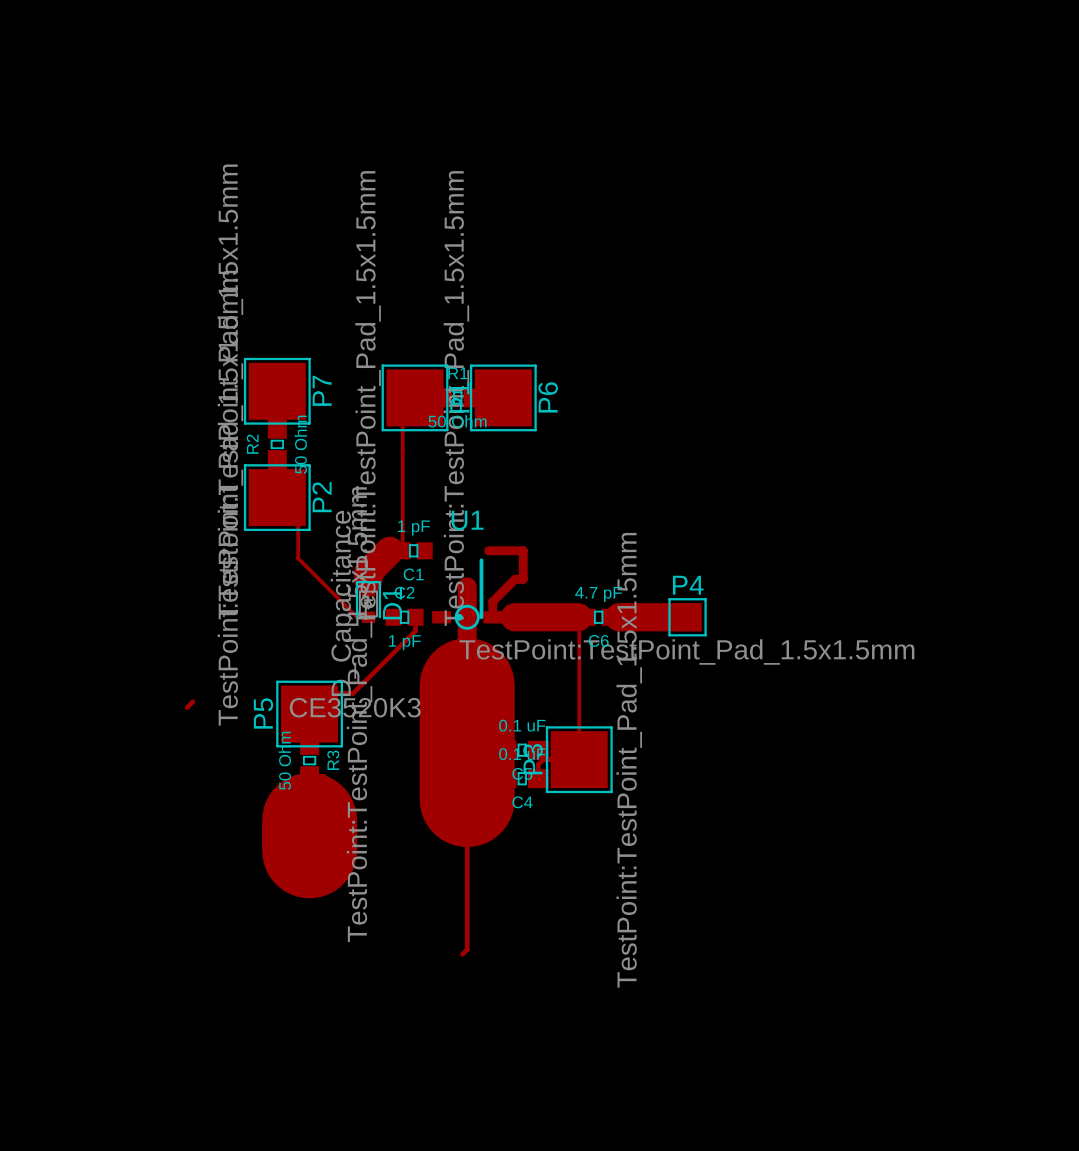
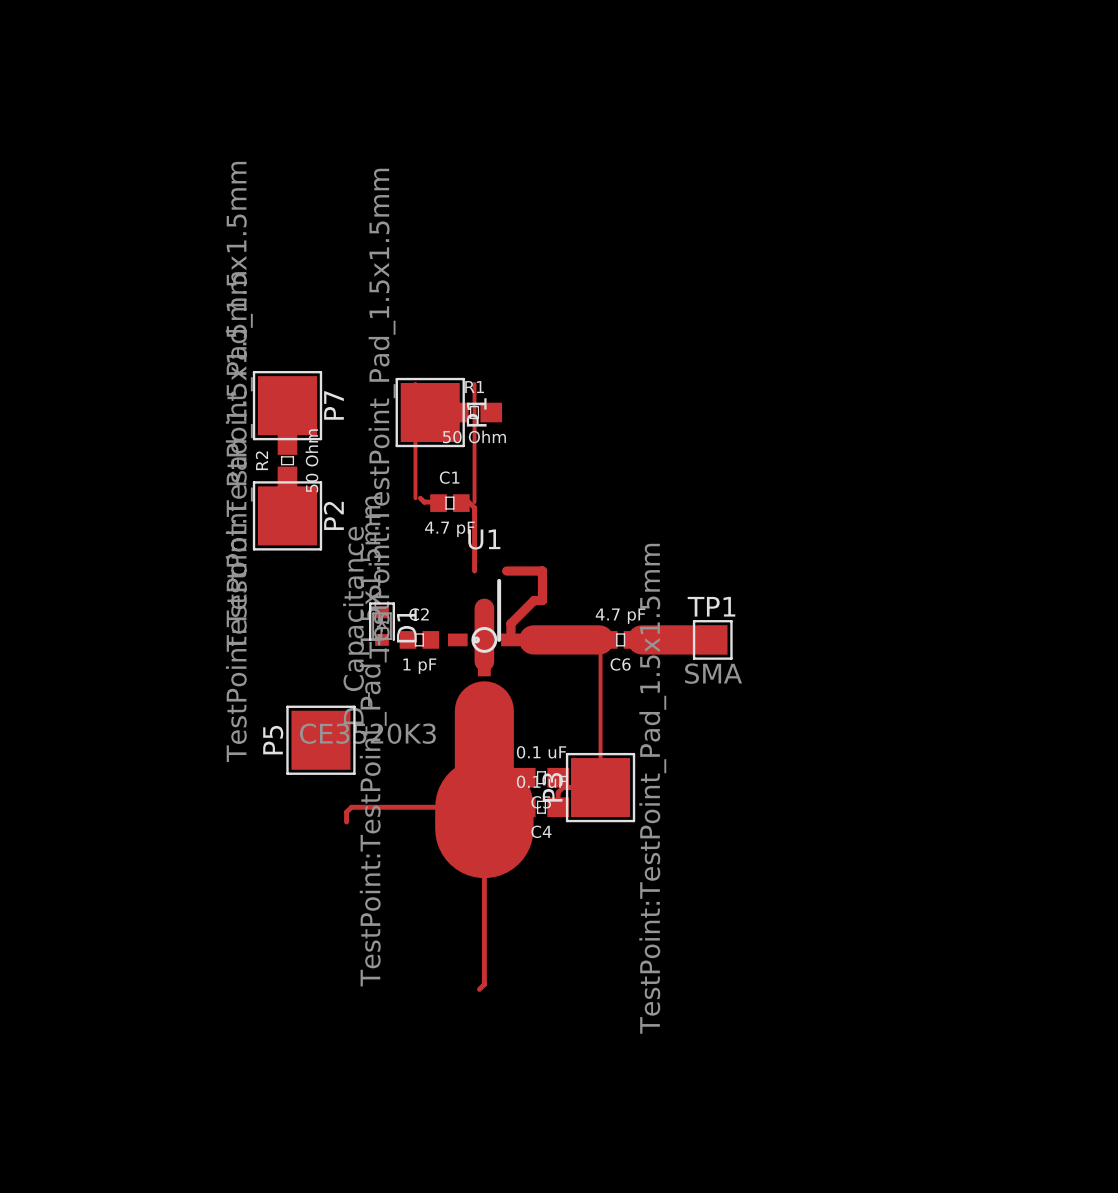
top track: none -> (415, 383) (415, 498)
top track: none -> (474, 383) (474, 502)
top track: (400, 383) (415, 397) (402, 410) (402, 550) (389, 550) (368, 572) (368, 590) -> none
P6: TestPoint:TestPoint_Pad_1.5x1.5mm (503, 397) -> none
top track: none -> (420, 498) (424, 502) (437, 502)
top track: none -> (468, 502) (474, 507) (474, 571)
top track: (298, 526) (298, 558) (357, 617) (368, 617) -> none
C1 value: 1 pF (413, 527) -> 4.7 pF (449, 529)
C1 position: (413, 550) -> (449, 503)
C1 name position: C1 (413, 574) -> C1 (449, 477)
P4 name: P4 (688, 585) -> TP1 (711, 606)
top track: (415, 617) (415, 630) (353, 693) (339, 693) -> none
P4 value: TestPoint:TestPoint_Pad_1.5x1.5mm (686, 652) -> SMA (713, 673)
top track width: thick (467, 685) (467, 778) -> thin (484, 710) (484, 807)
top track: (192, 701) (187, 707) -> none
R3: 50 Ohm (309, 760) -> none
top track: (325, 778) (323, 776) (309, 776) (309, 791) -> none
top track: none -> (484, 807) (351, 807) (346, 812) (346, 822)
top track: (309, 820) (309, 850) -> none

